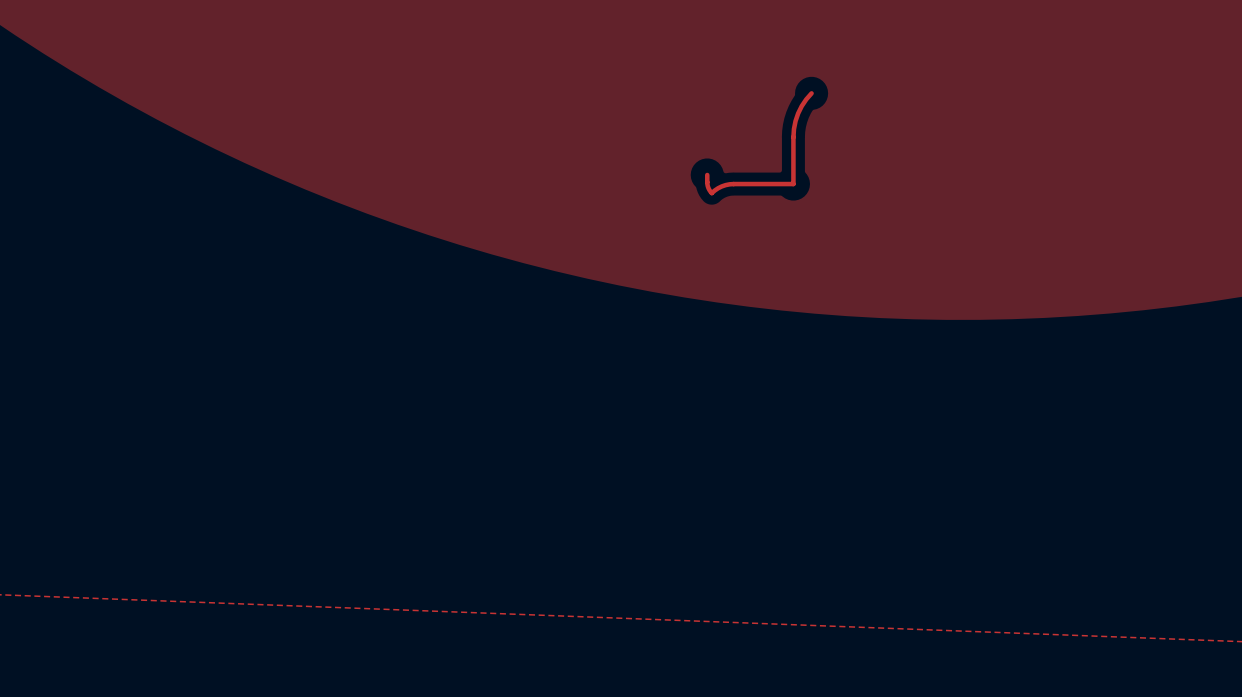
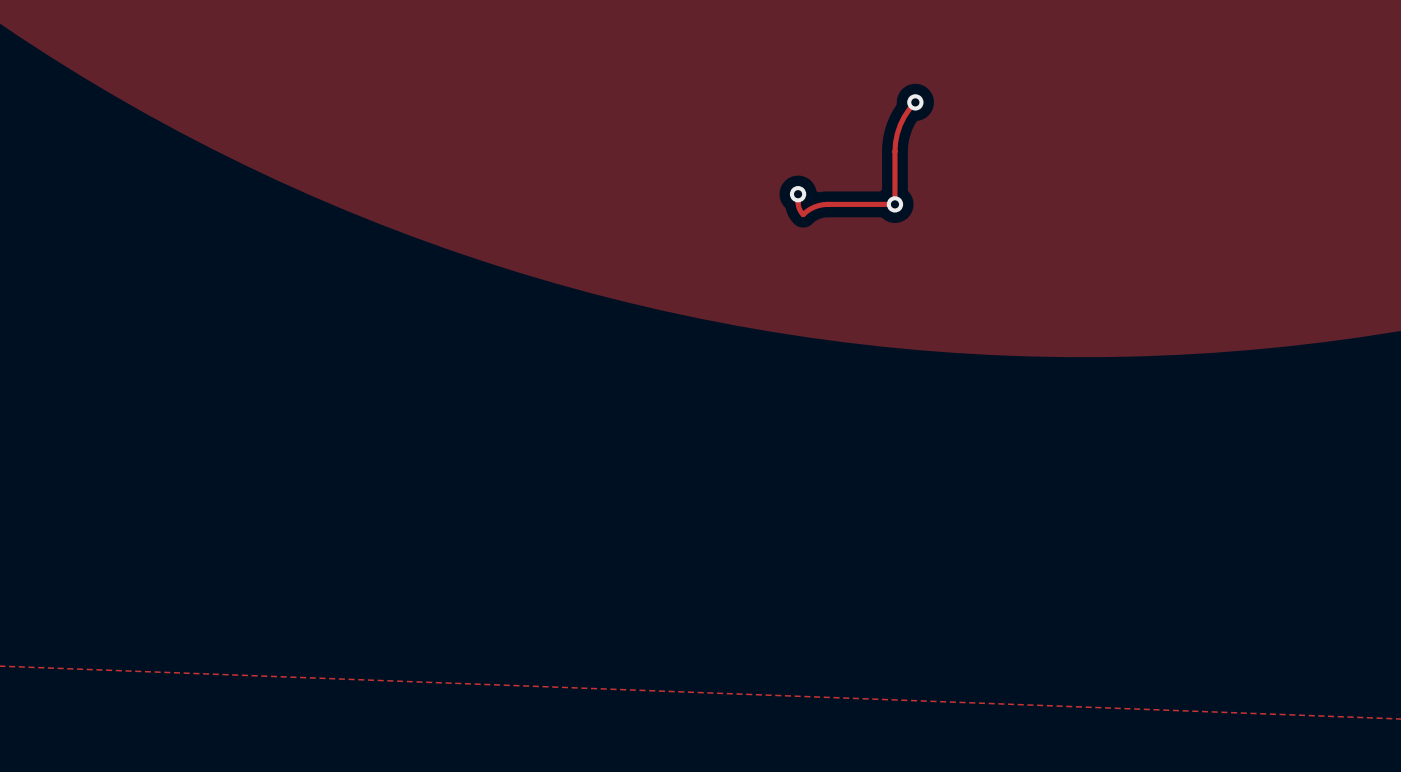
via: none -> (915, 102)
via: none -> (798, 194)
via: none -> (894, 204)

